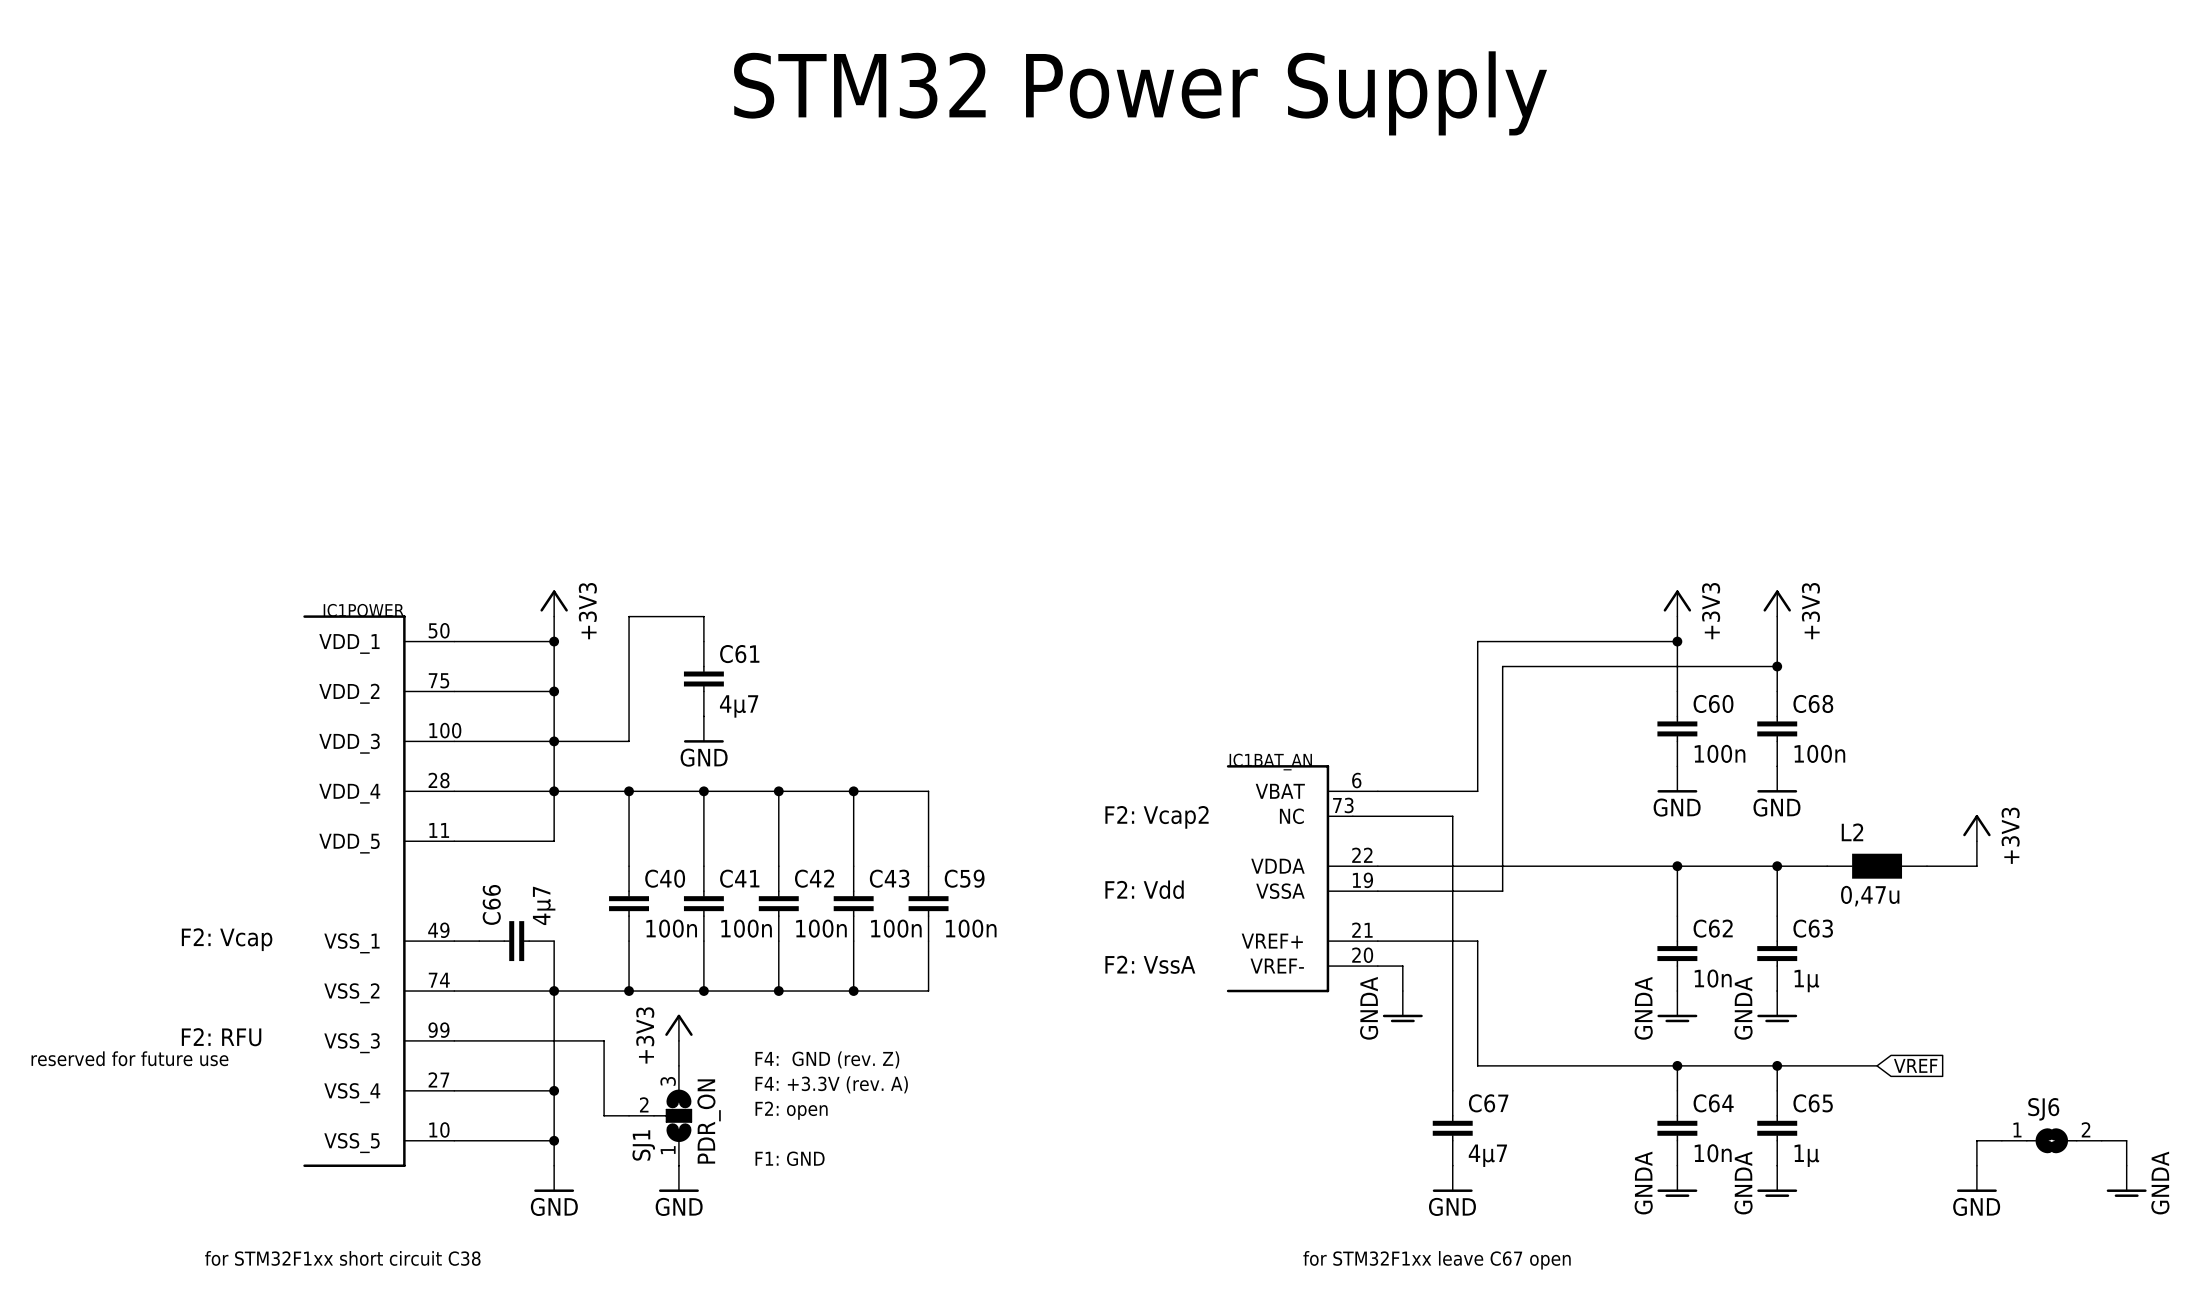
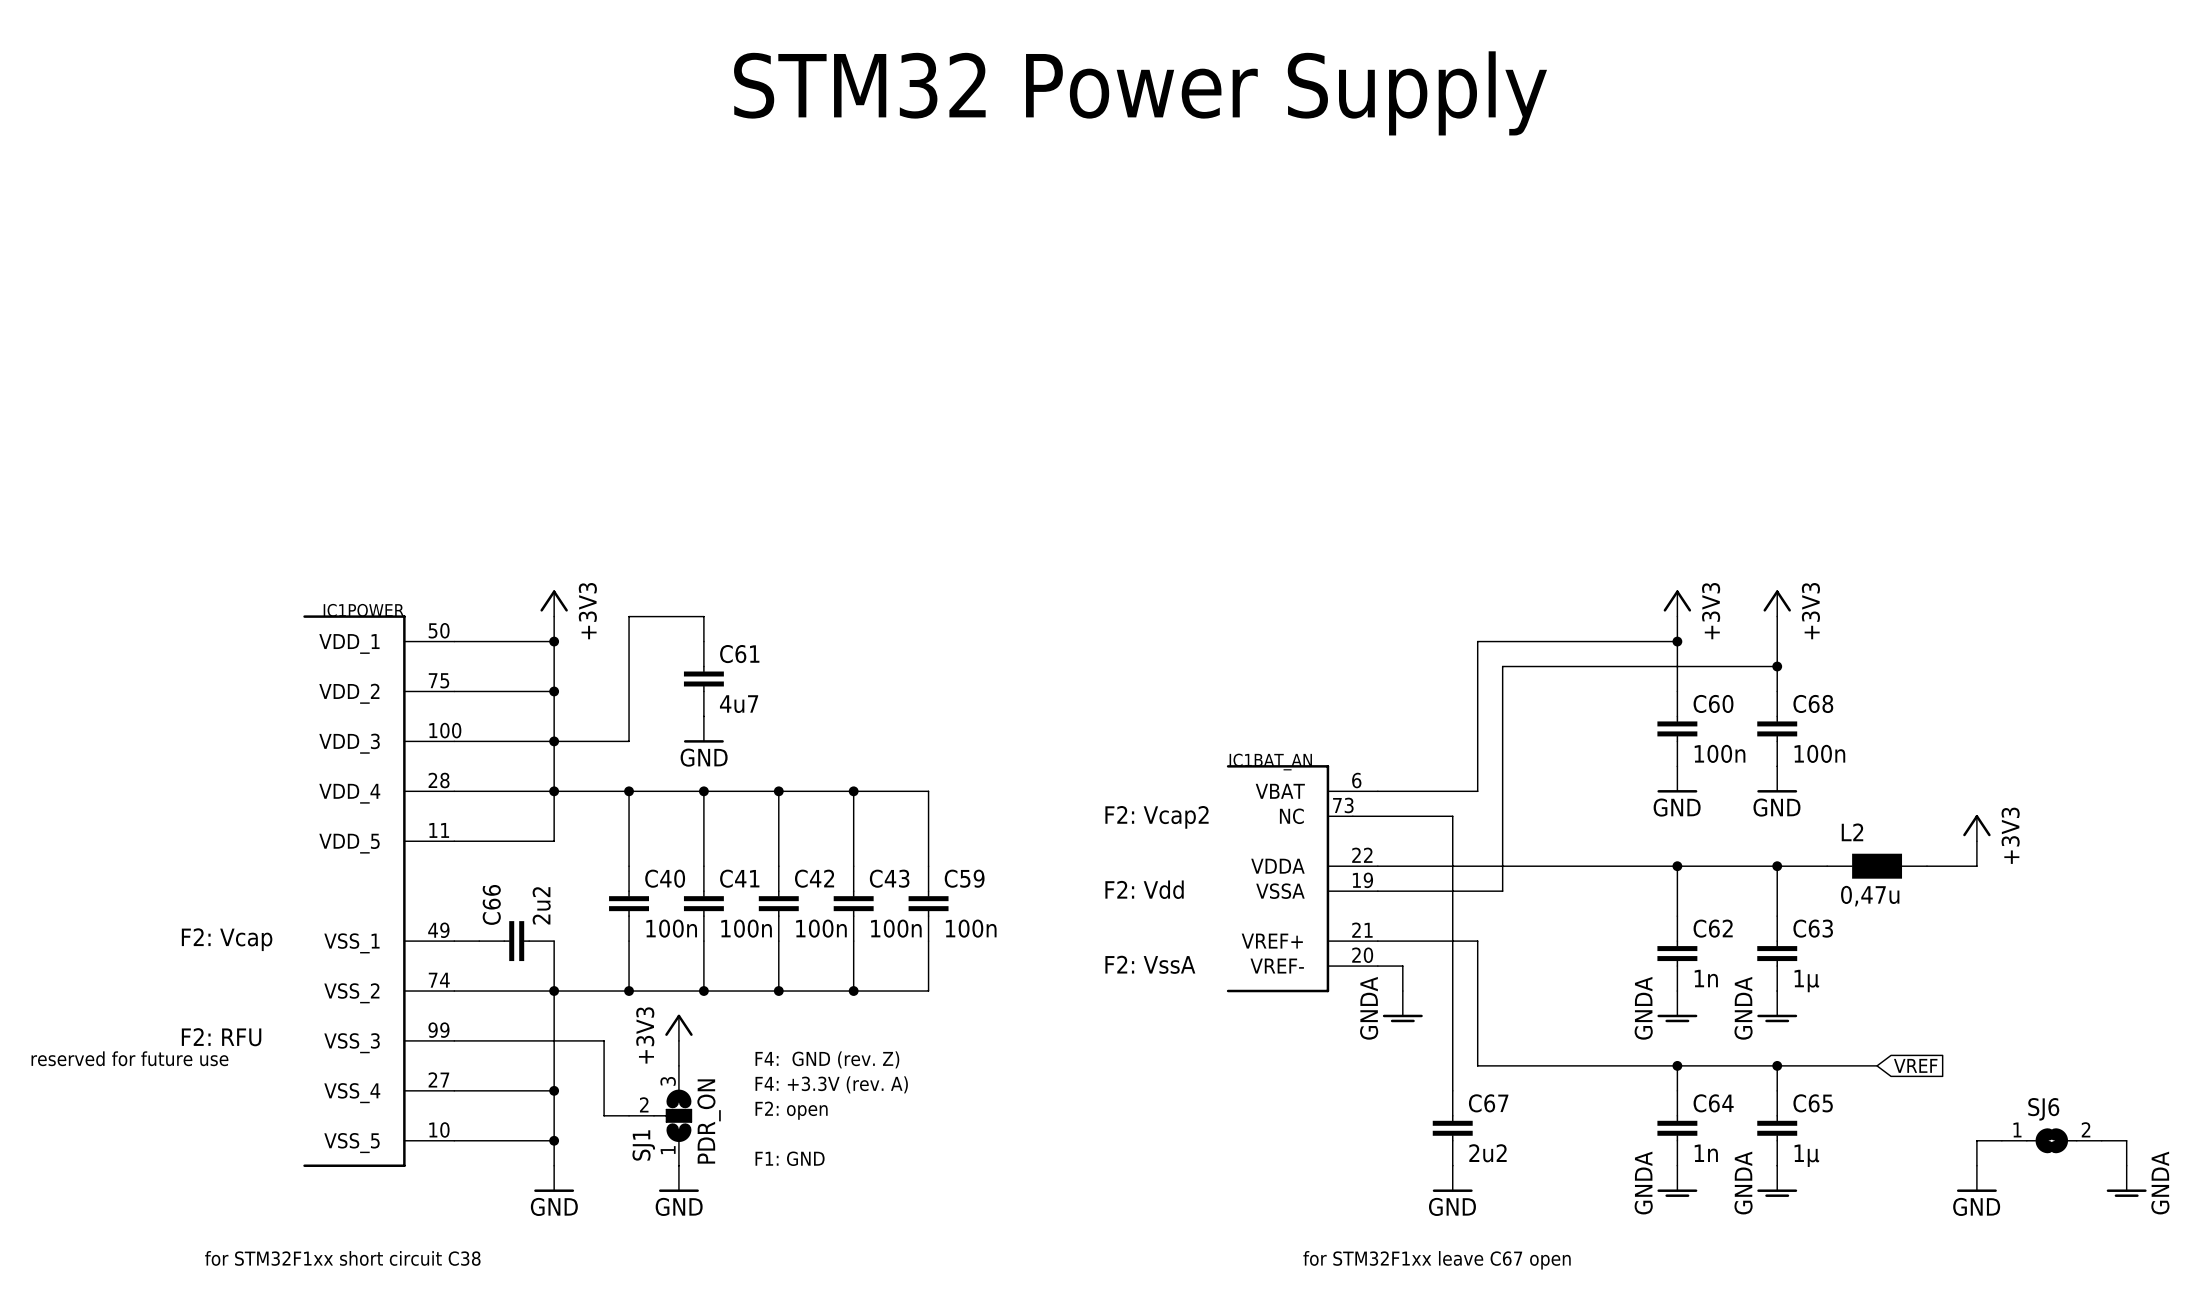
C61 value: 4µ7 (739, 706) -> 4u7 (739, 704)
C66 value: 4µ7 (544, 905) -> 2u2 (541, 905)
C62 value: 10n (1713, 978) -> 1n (1706, 978)
C64 value: 10n (1713, 1153) -> 1n (1706, 1153)
C67 value: 4µ7 (1487, 1155) -> 2u2 (1487, 1153)

